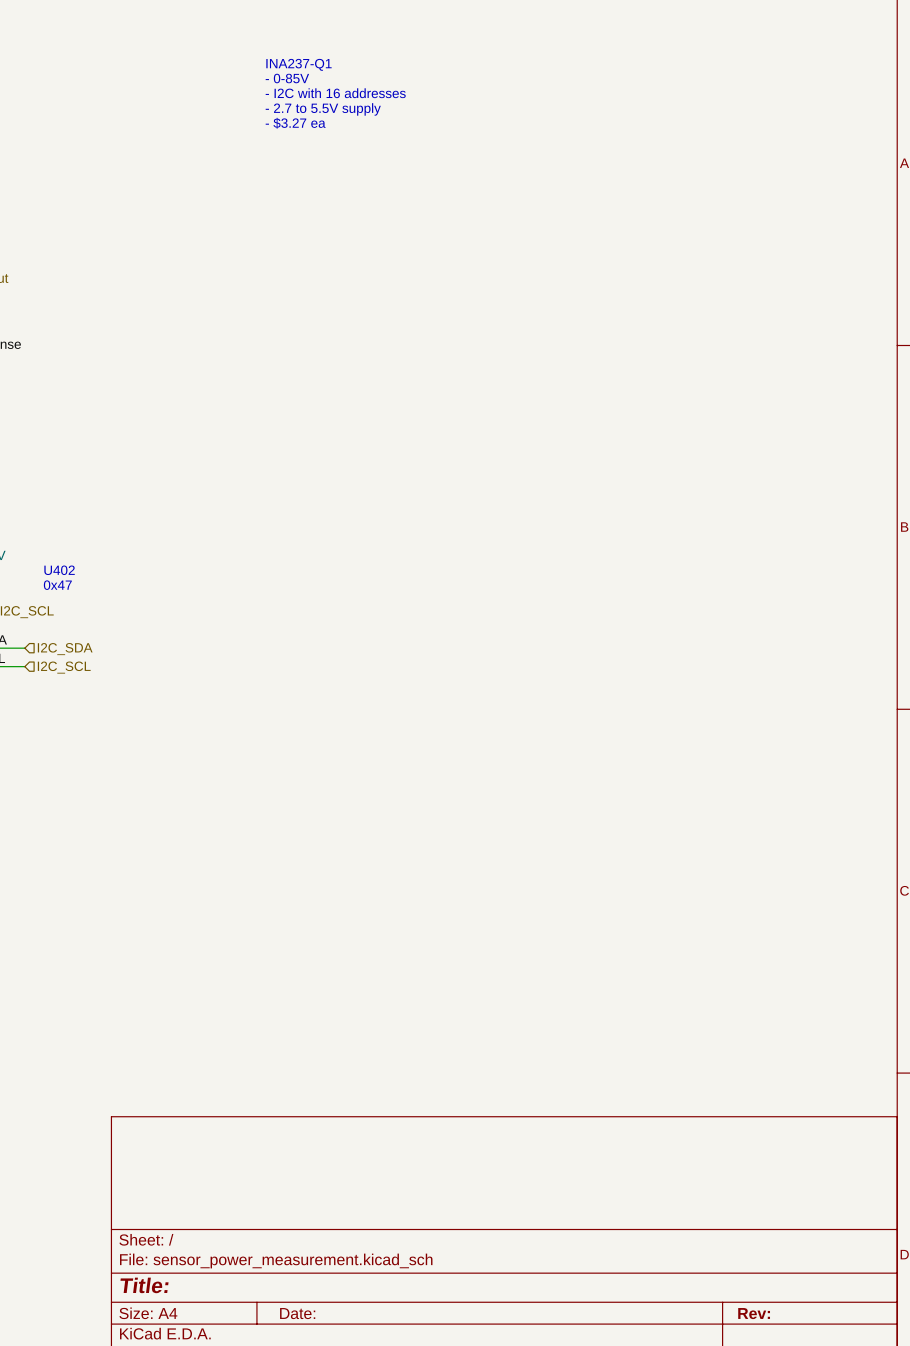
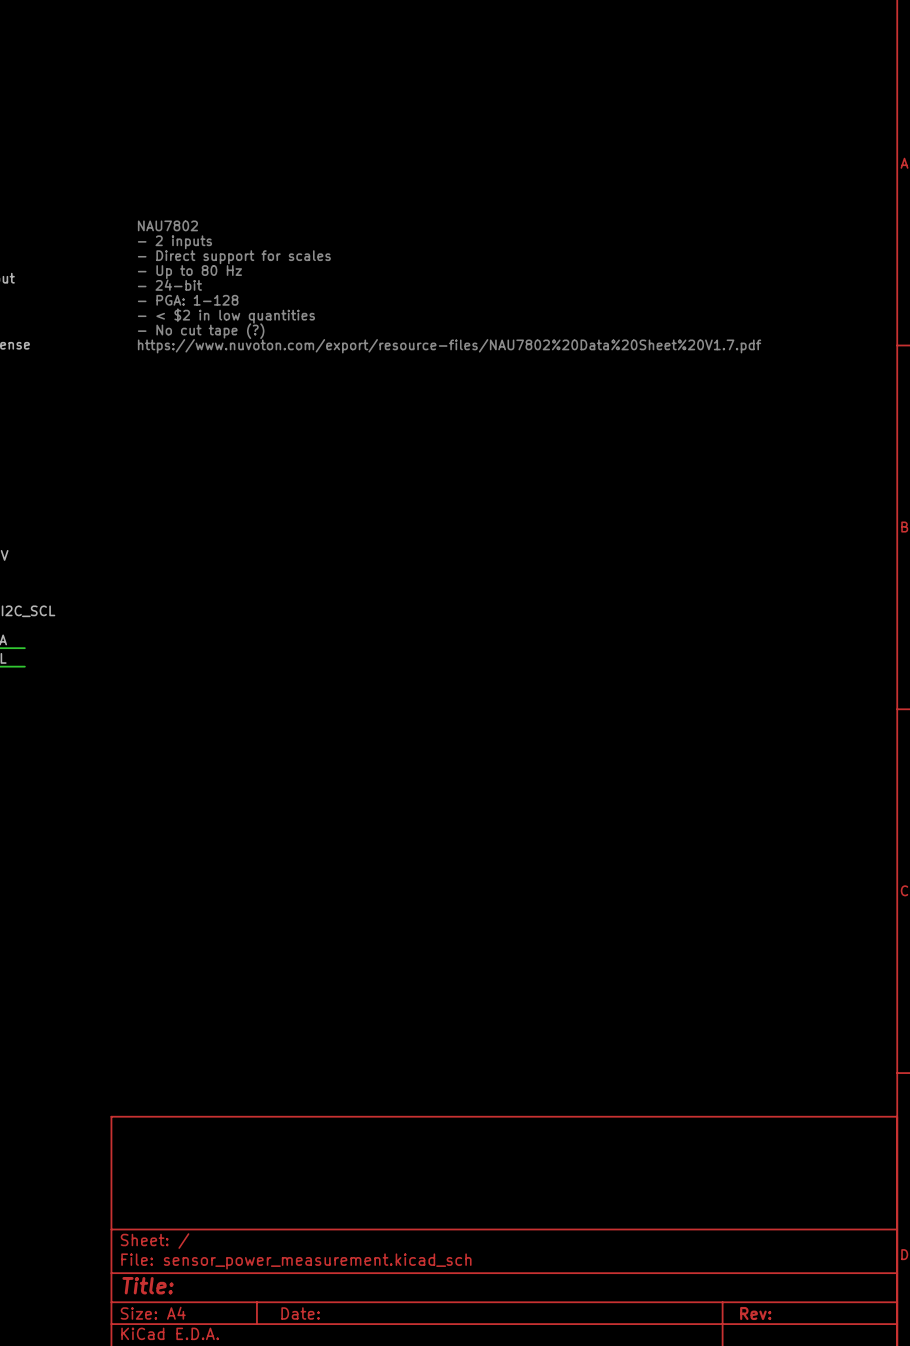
text: INA237-Q1 (298, 64) -> none
text: - 0-85V (287, 78) -> none
text: - I2C with 16 addresses (335, 93) -> none
text: - 2.7 to 5.5V supply (323, 109) -> none
text: - $3.27 ea (295, 123) -> none
text: none -> NAU7802 (167, 225)
text: none -> - 2 inputs (174, 242)
text: none -> - Direct support for scales (234, 257)
text: none -> - Up to 80 Hz (189, 272)
text: none -> - 24-bit (169, 285)
text: none -> - PGA: 1-128 (188, 300)
text: none -> - < $2 in low quantities (226, 316)
text: none -> - No cut tape (?) (201, 331)
text: none -> https://www.nuvoton.com/export/resource-files/NAU7802%20Data%20Sheet%20V1.7.pdf (449, 346)
text: U402 (59, 570) -> none
text: 0x47 (57, 585) -> none
hierarchical label: I2C_SDA (65, 649) -> none
hierarchical label: I2C_SCL (64, 667) -> none

